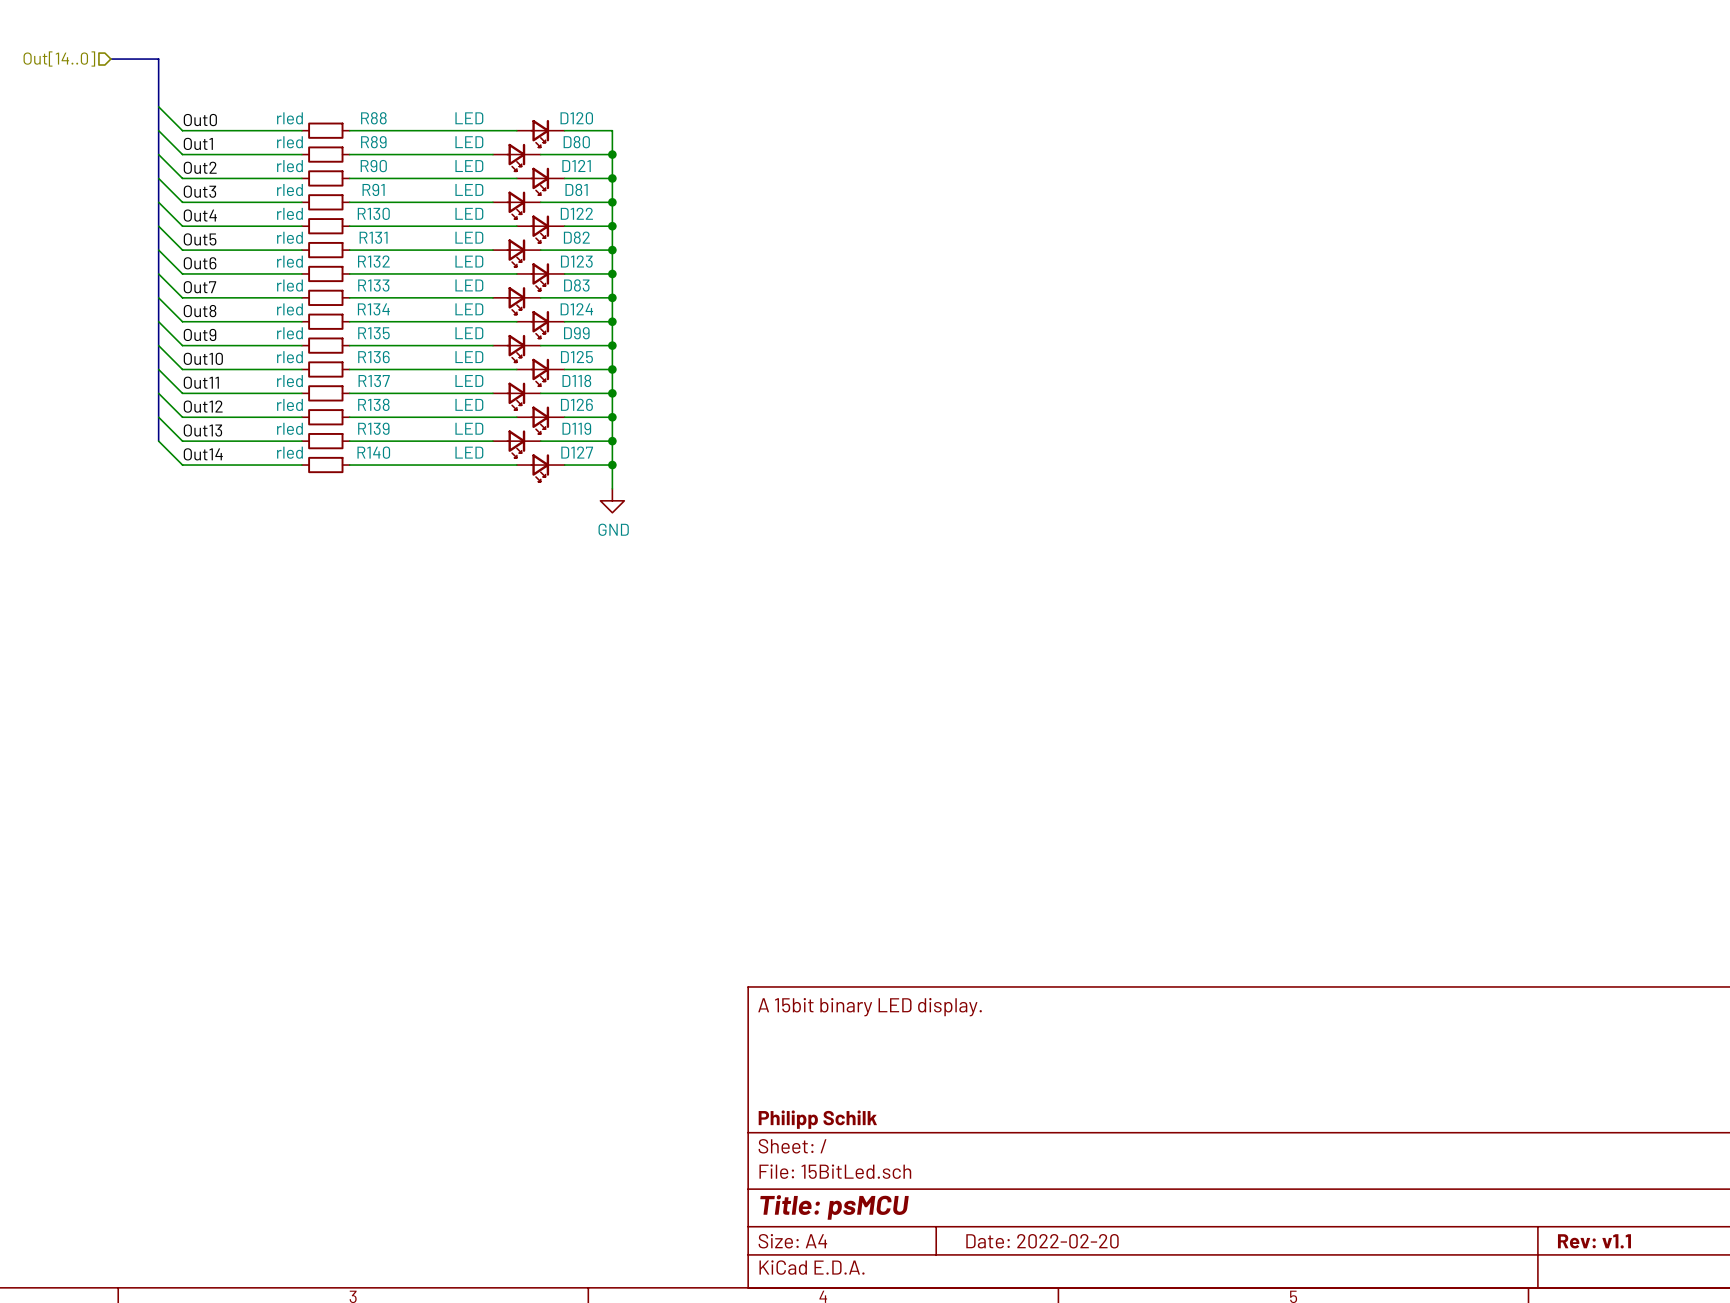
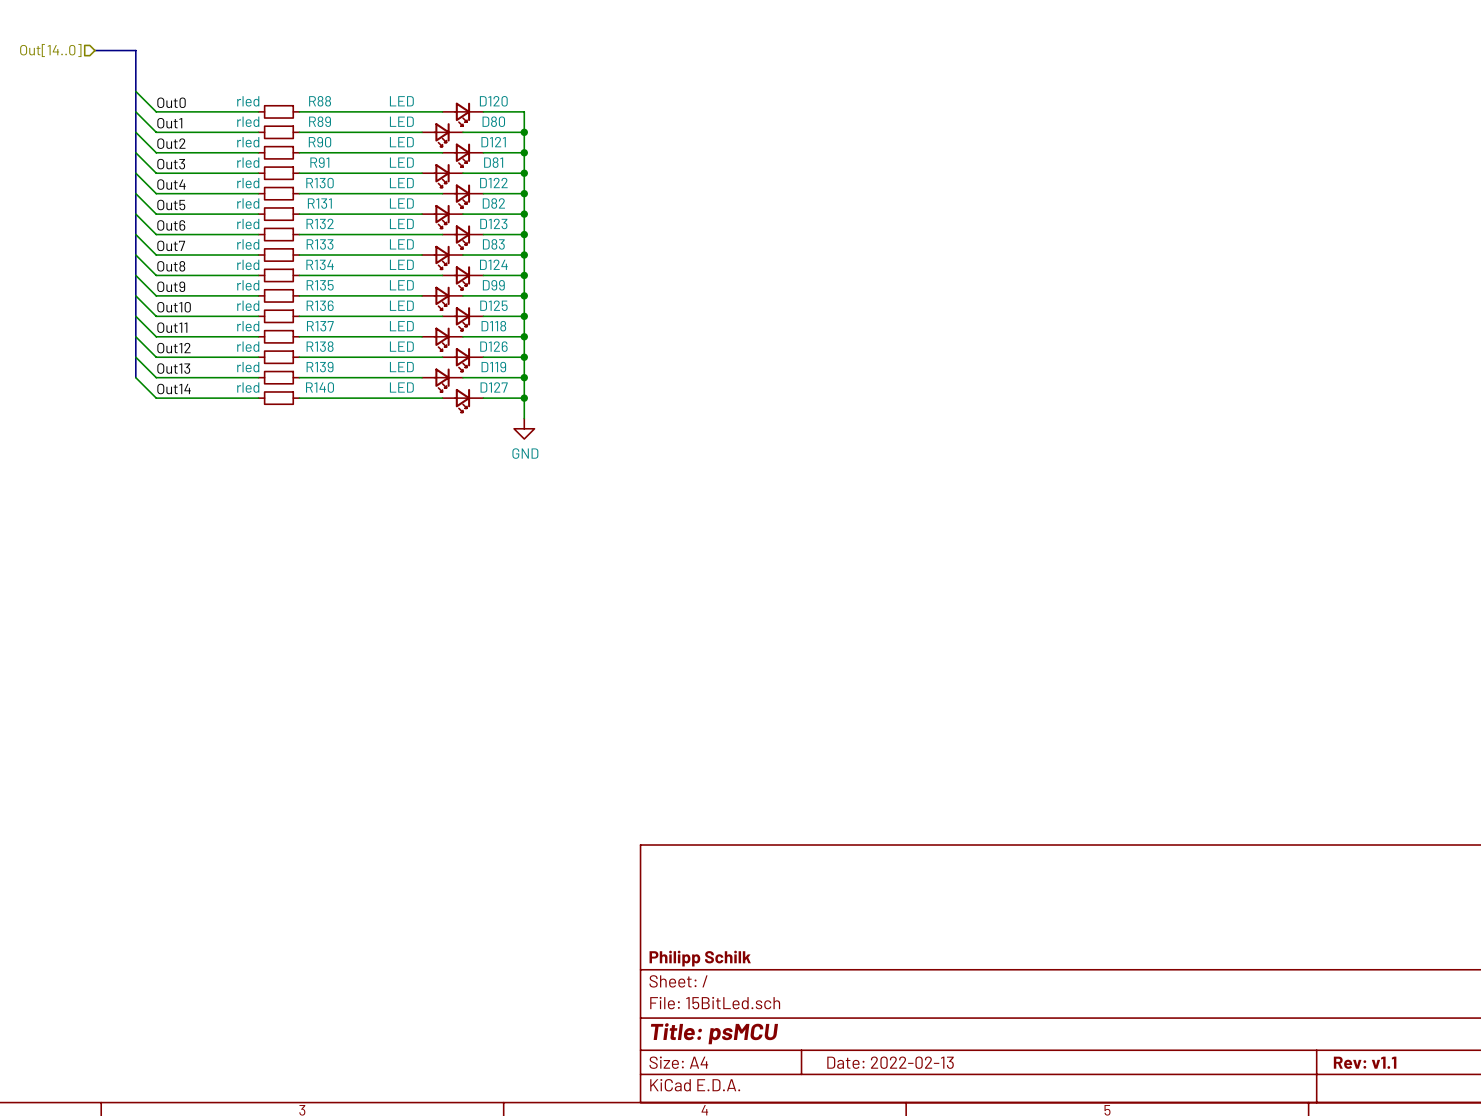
title block: A 15bit binary LED display. (870, 1007) -> none
title block: Date: 2022-02-20 (1042, 1241) -> Date: 2022-02-13 (890, 1062)

